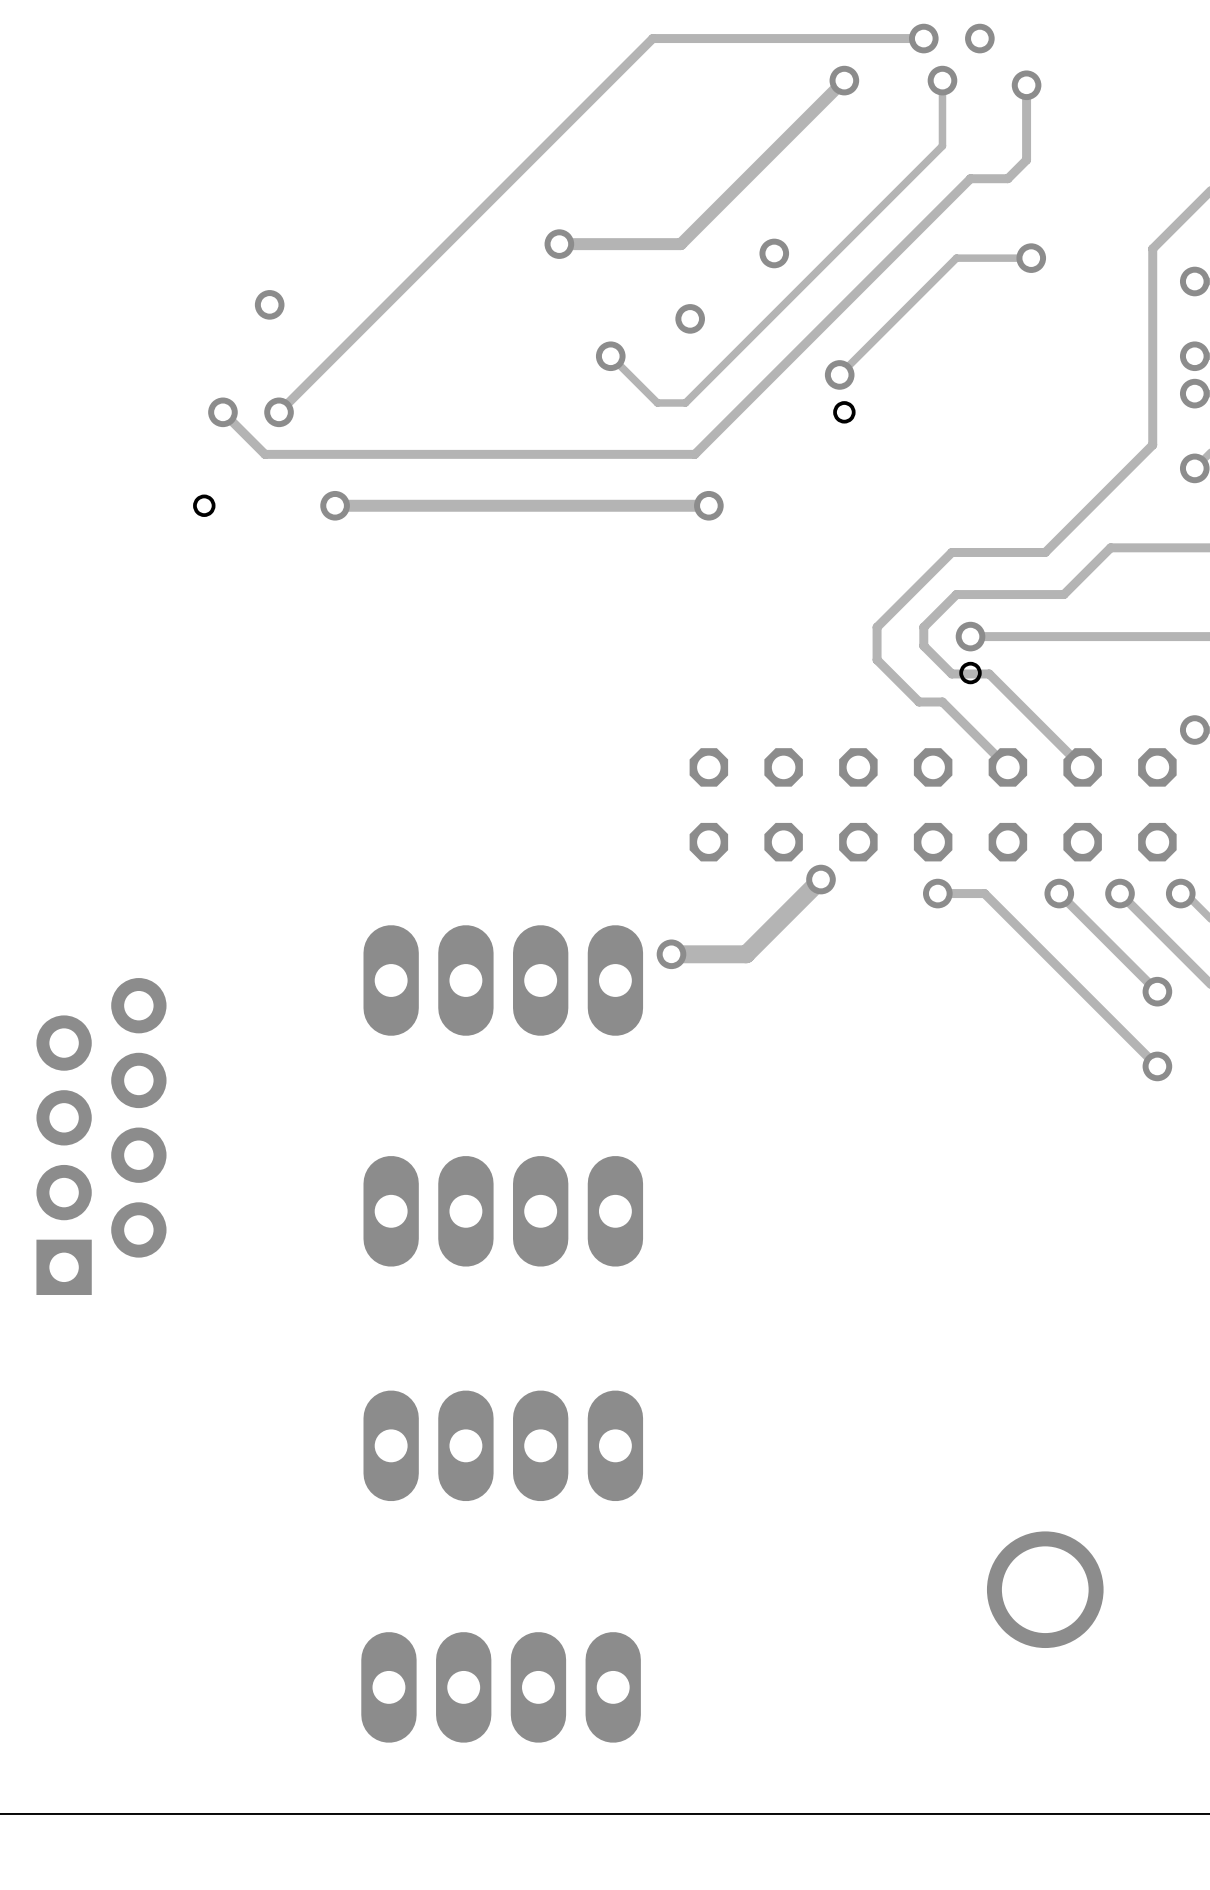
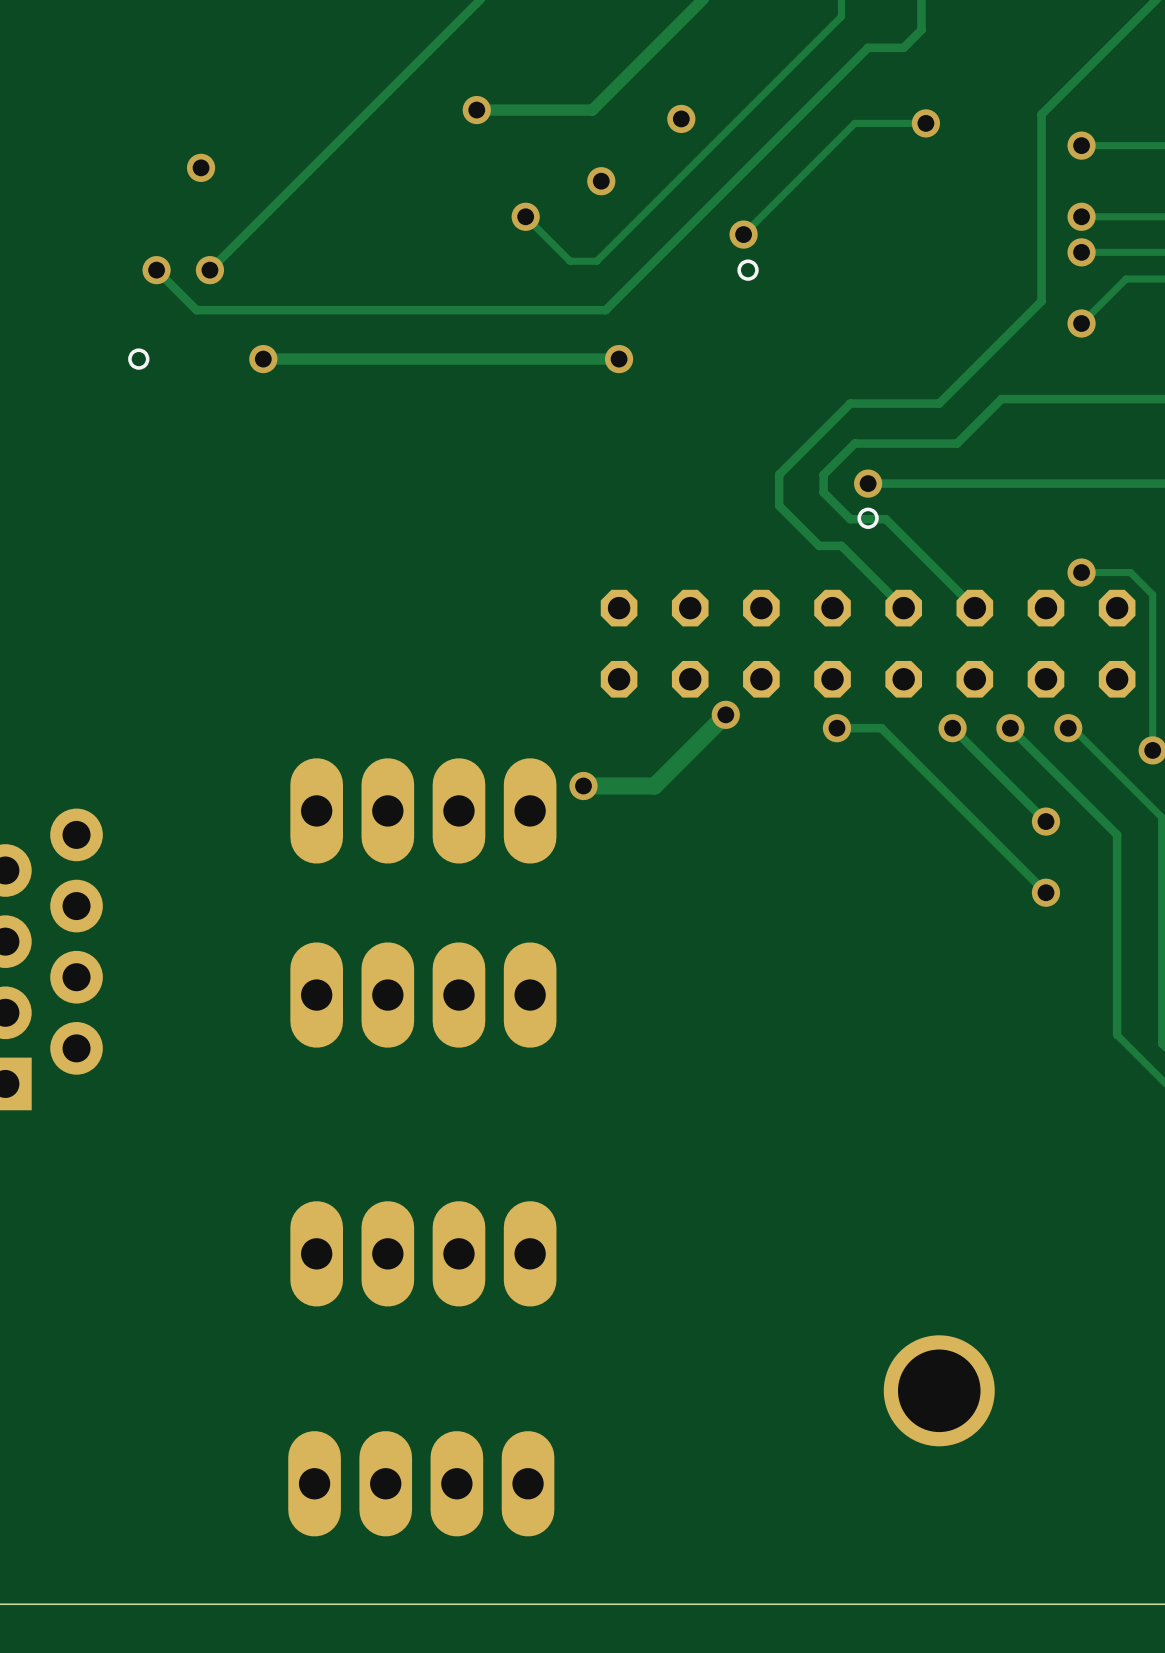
part position: (503, 1211) -> (423, 995)

